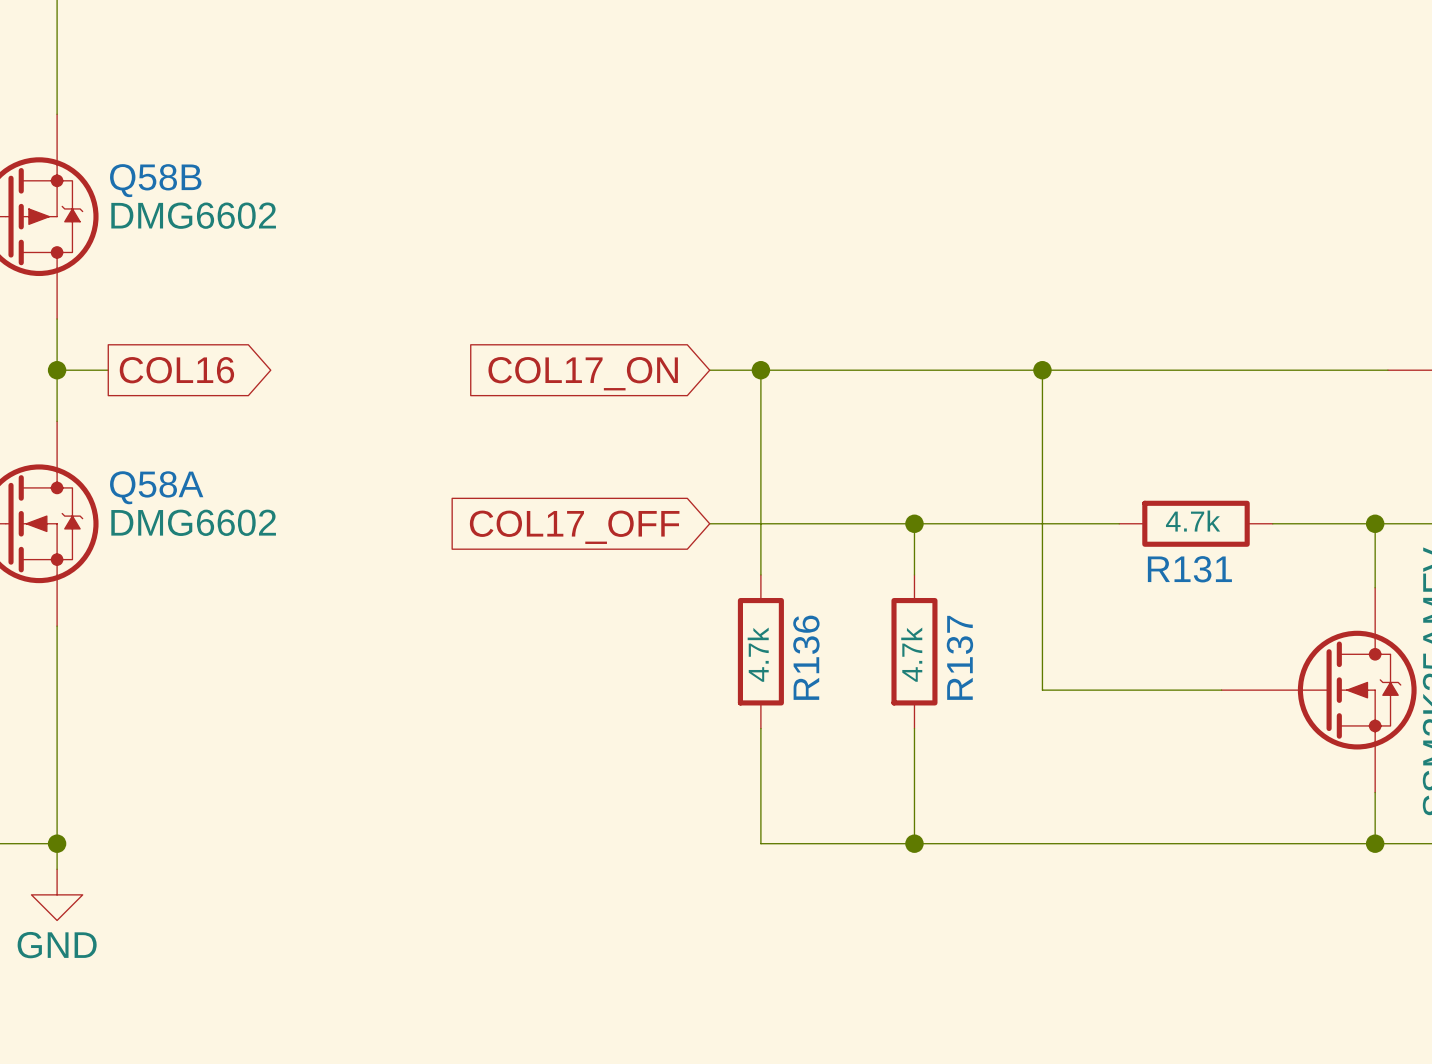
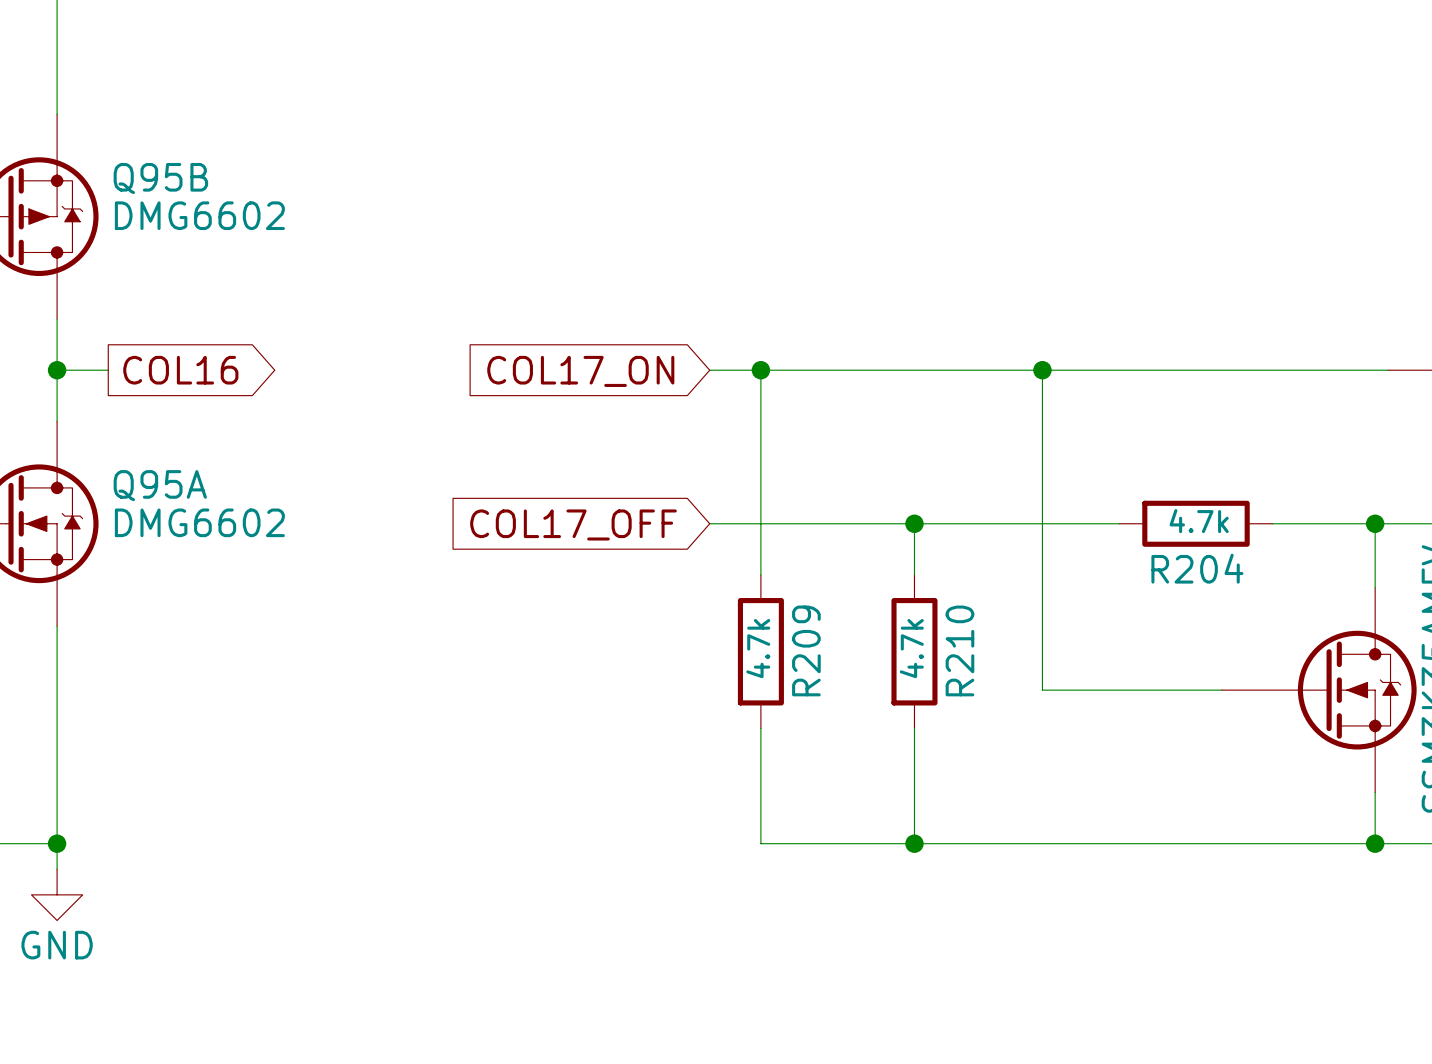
Q58B name: Q58B (155, 180) -> Q95B (160, 178)
Q58A name: Q58A (156, 487) -> Q95A (160, 485)
R131 name: R131 (1189, 569) -> R204 (1197, 568)
R136 name: R136 (806, 657) -> R209 (806, 650)
R137 name: R137 (959, 657) -> R210 (959, 650)

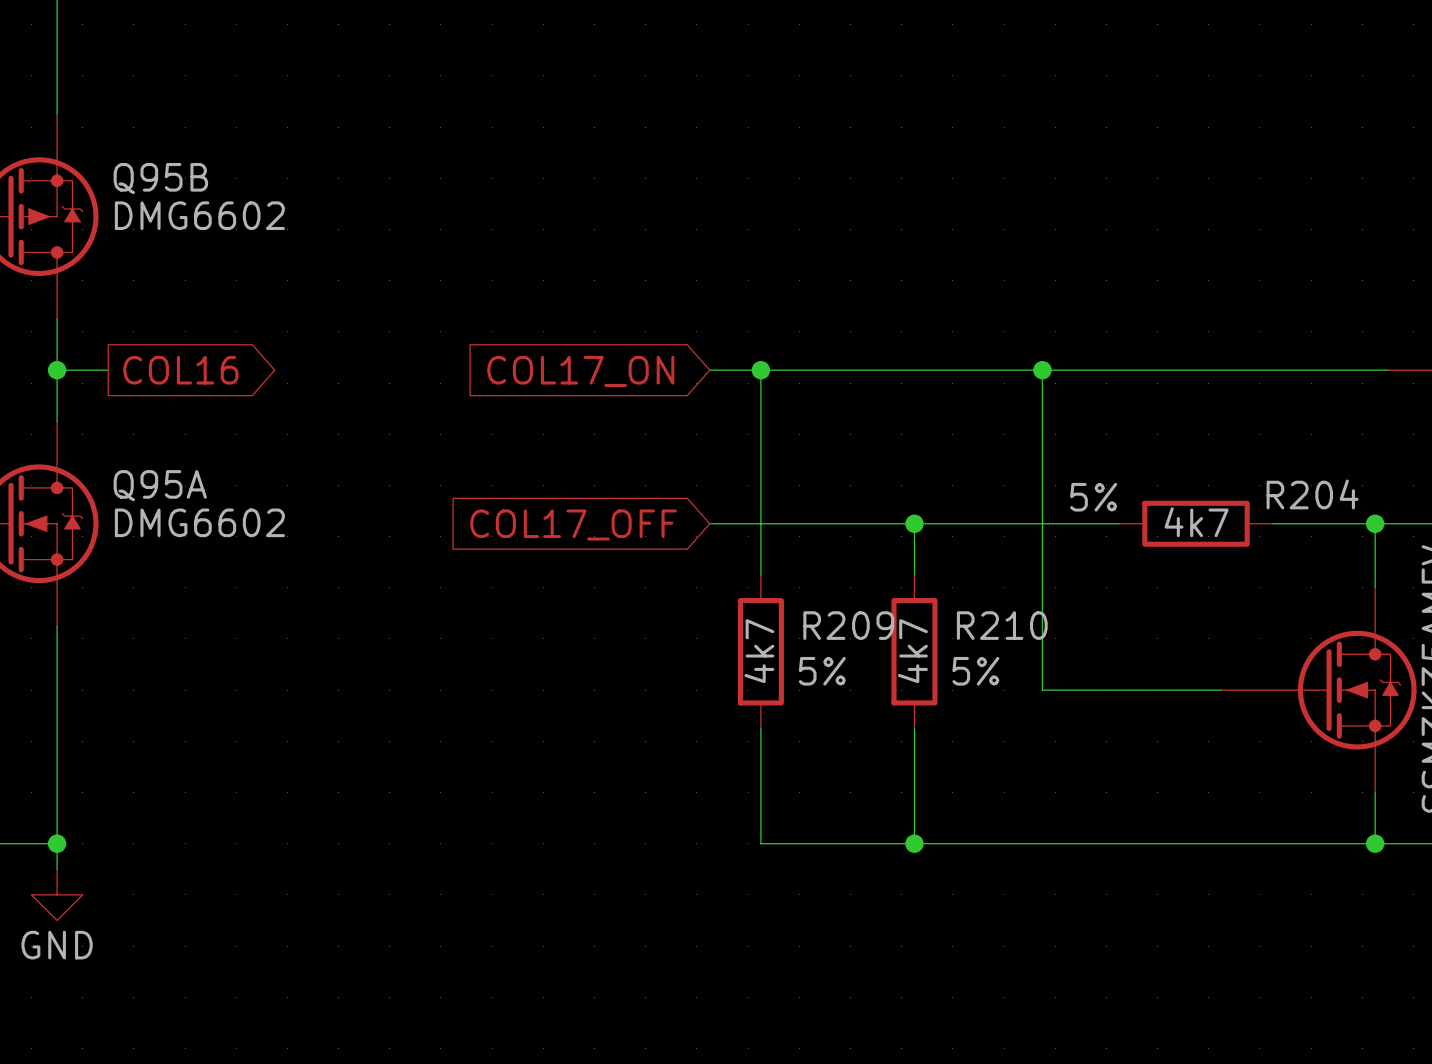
R204 text: none -> 5% (1093, 497)
R204 text: 4.7k (1199, 521) -> none
R204 text: none -> 4k7 (1196, 522)
R204 name position: R204 (1197, 568) -> R204 (1312, 494)
R209 text: 4.7k (758, 648) -> none
R210 text: 4.7k (911, 648) -> none
R209 name rotation: 0° (806, 650) -> 90° clockwise (848, 625)
R210 name rotation: 0° (959, 650) -> 90° clockwise (1002, 625)
R209 text: none -> 4k7 (759, 651)
R210 text: none -> 4k7 (912, 651)
R209 text: none -> 5% (822, 671)
R210 text: none -> 5% (975, 671)

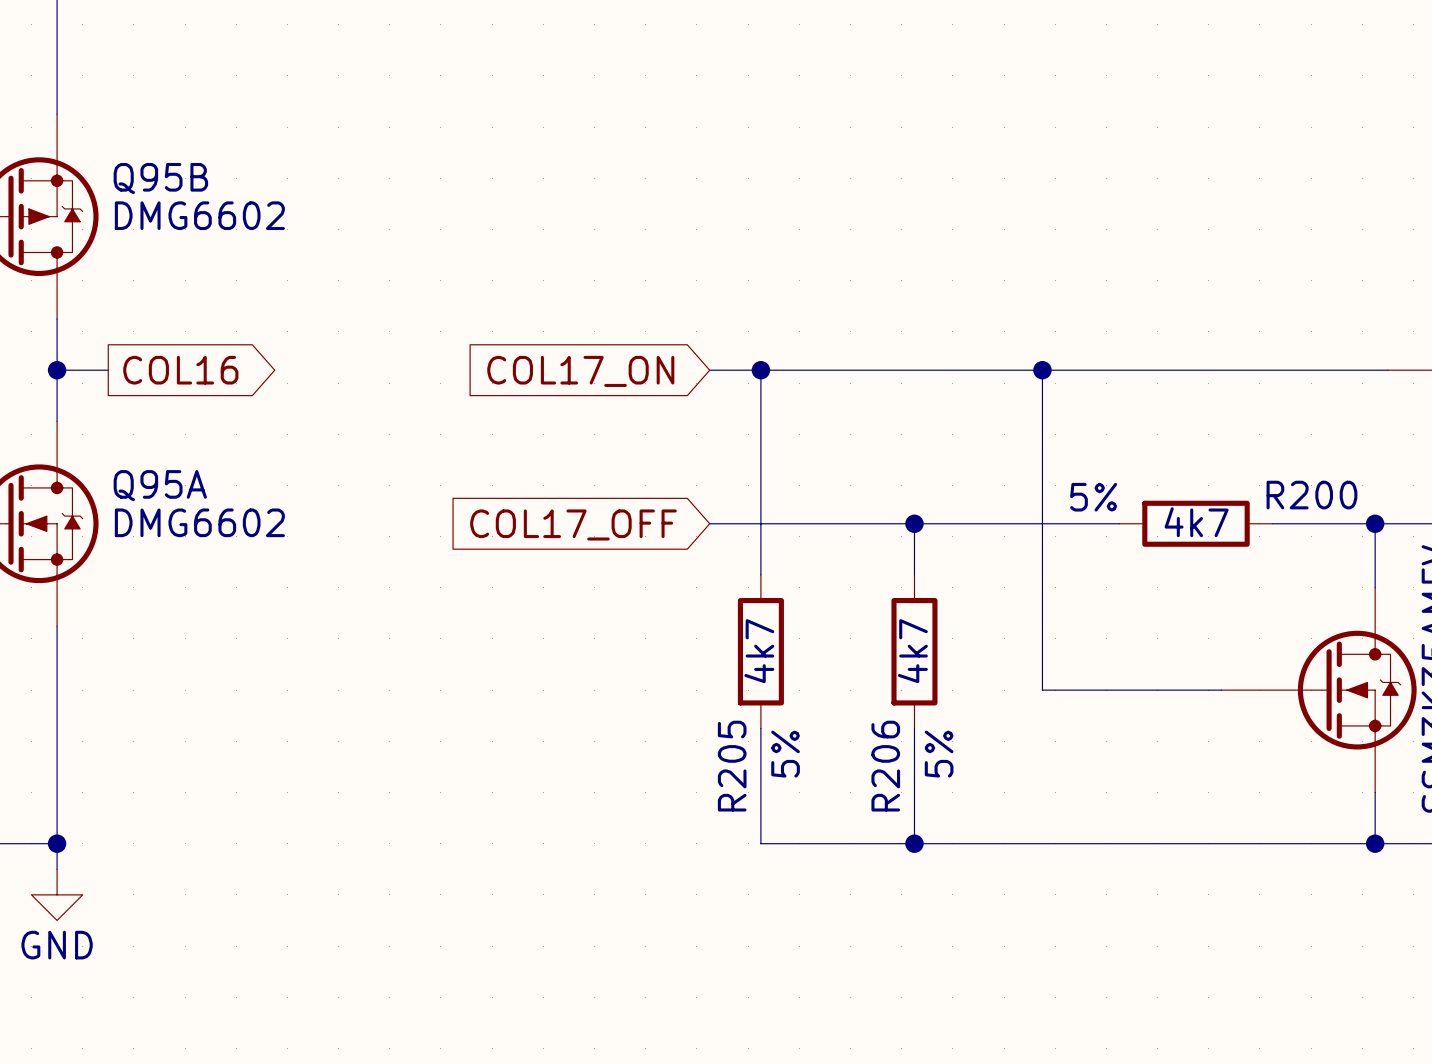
R204 name: R204 (1312, 494) -> R200 (1311, 495)
R209 name: R209 (848, 625) -> R205 (732, 766)
R210 name: R210 (1002, 625) -> R206 (885, 766)
R209 text rotation: 0° (822, 671) -> 90° counterclockwise (785, 754)
R209 text position: 5% (822, 671) -> 5% (785, 754)
R210 text rotation: 0° (975, 671) -> 90° counterclockwise (939, 754)
R210 text position: 5% (975, 671) -> 5% (939, 754)

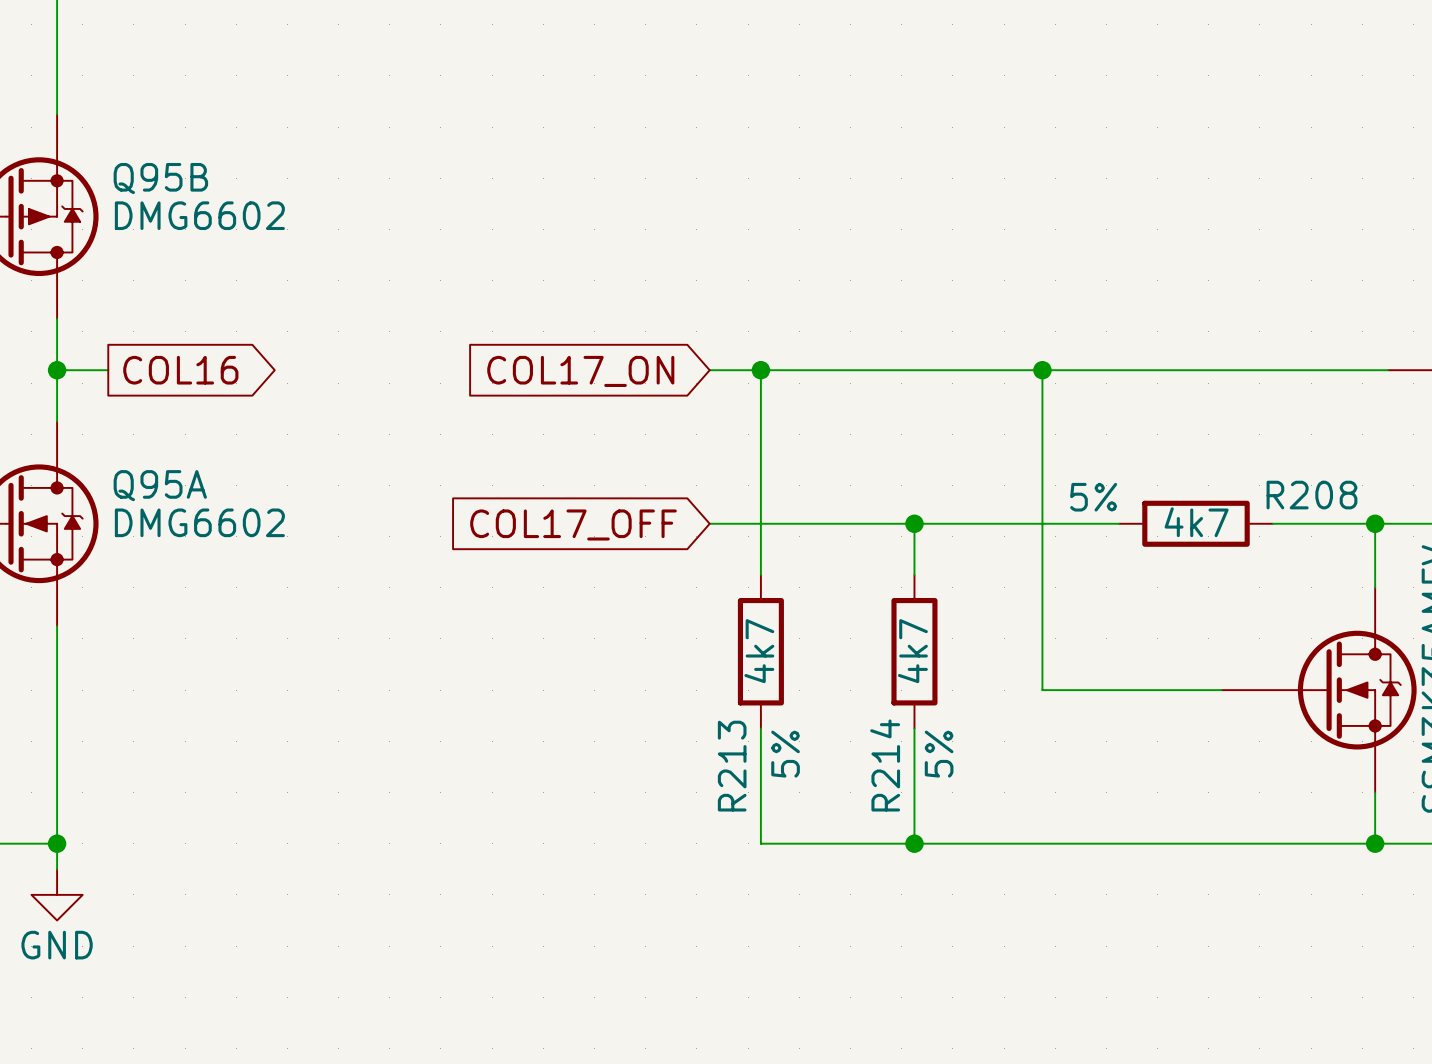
R200 name: R200 (1311, 495) -> R208 (1311, 495)
R205 name: R205 (732, 766) -> R213 (732, 766)
R206 name: R206 (885, 766) -> R214 (885, 765)

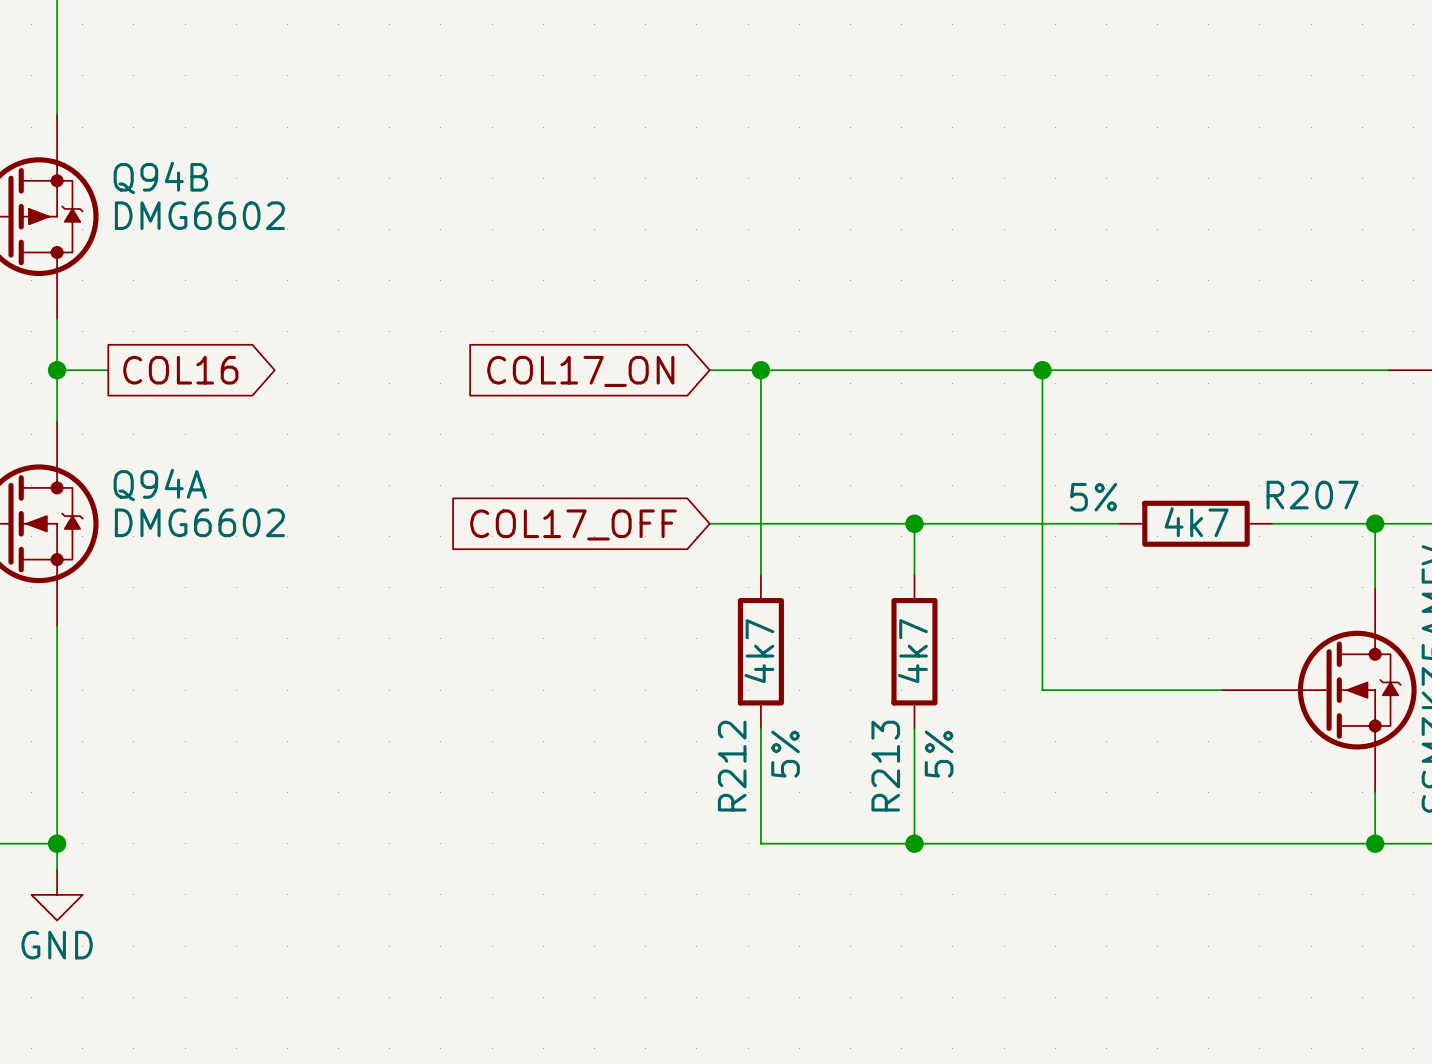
Q95B name: Q95B (160, 178) -> Q94B (160, 177)
Q95A name: Q95A (160, 485) -> Q94A (160, 485)
R208 name: R208 (1311, 495) -> R207 (1312, 495)
R214 name: R214 (885, 765) -> R213 (885, 766)
R213 name: R213 (732, 766) -> R212 (732, 766)

